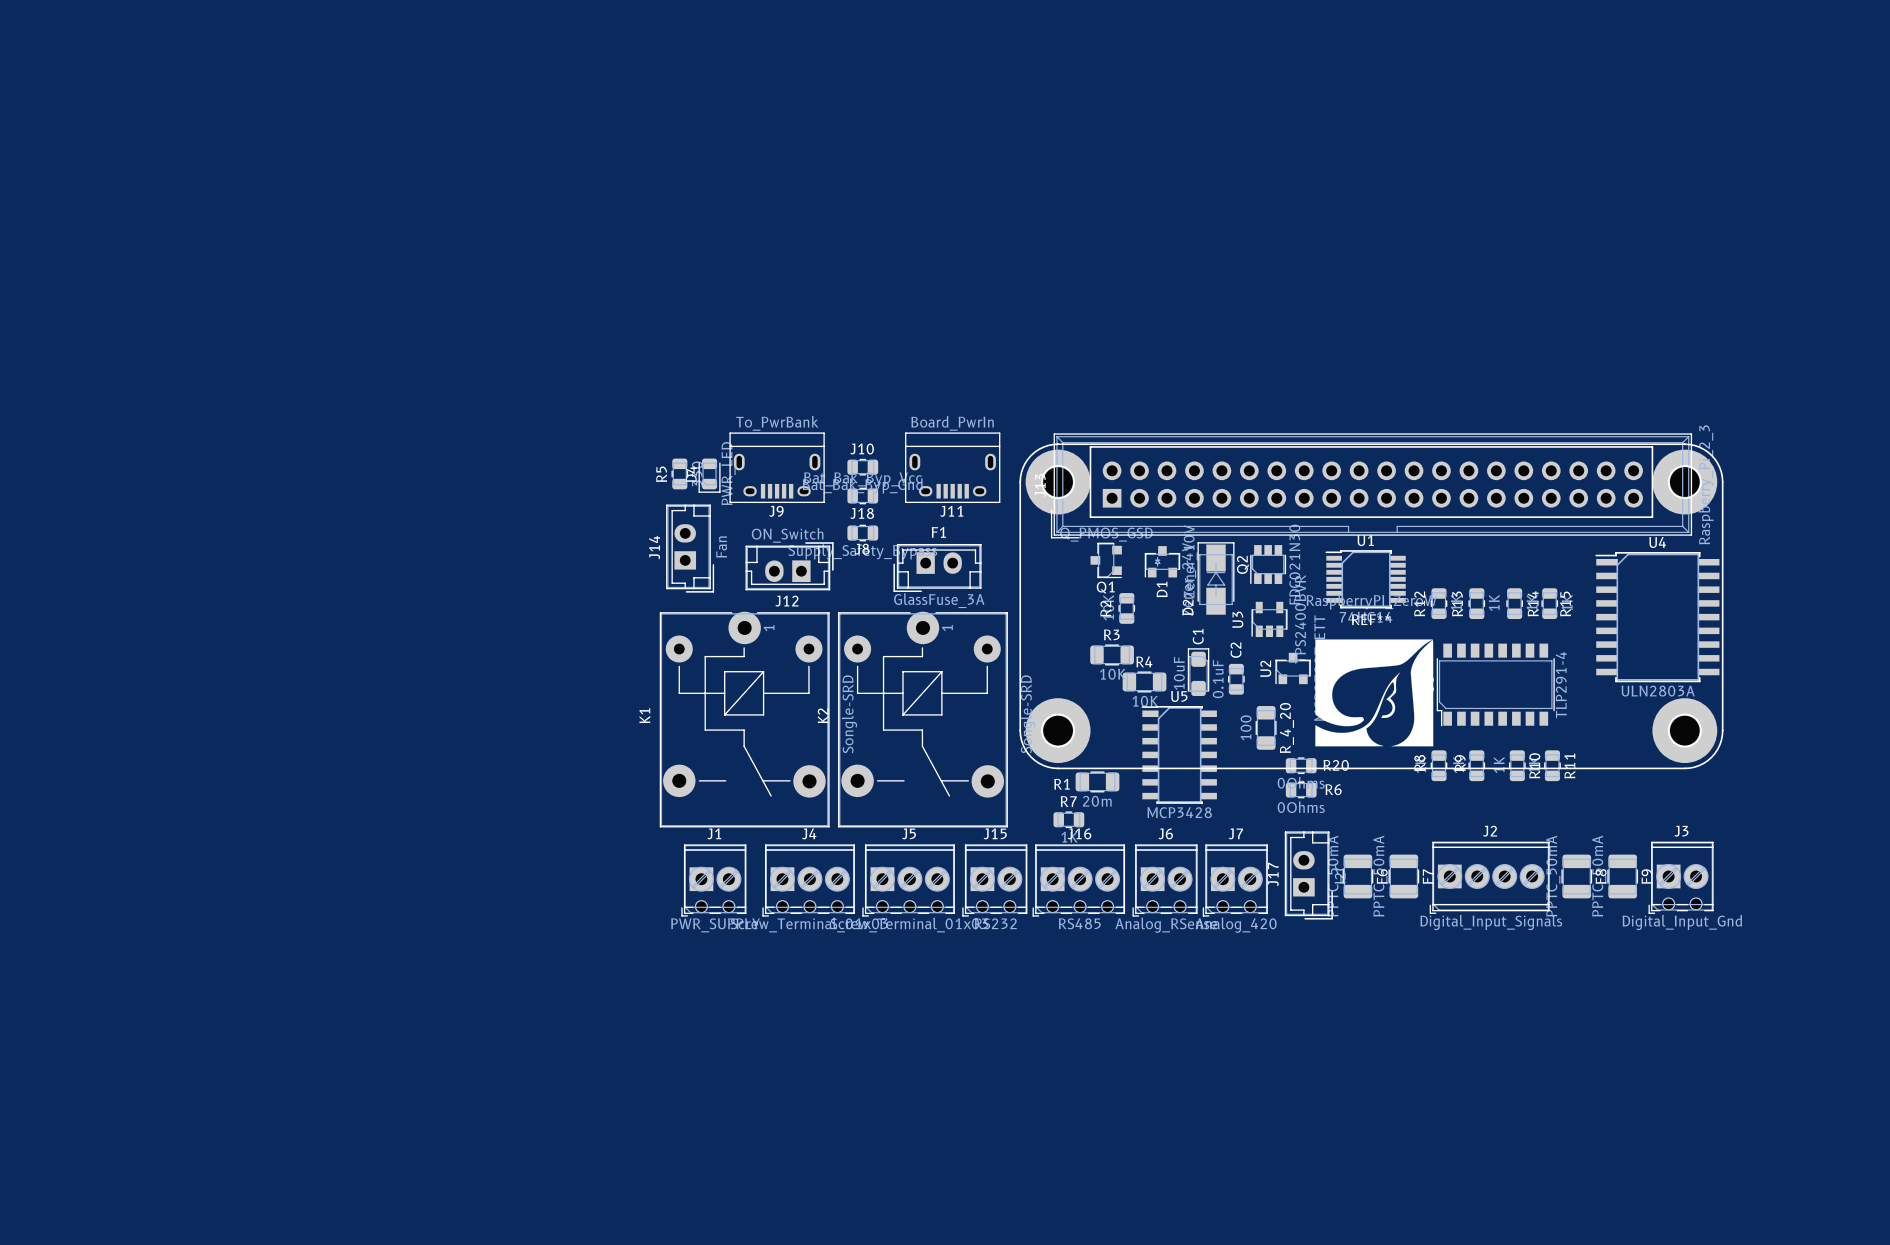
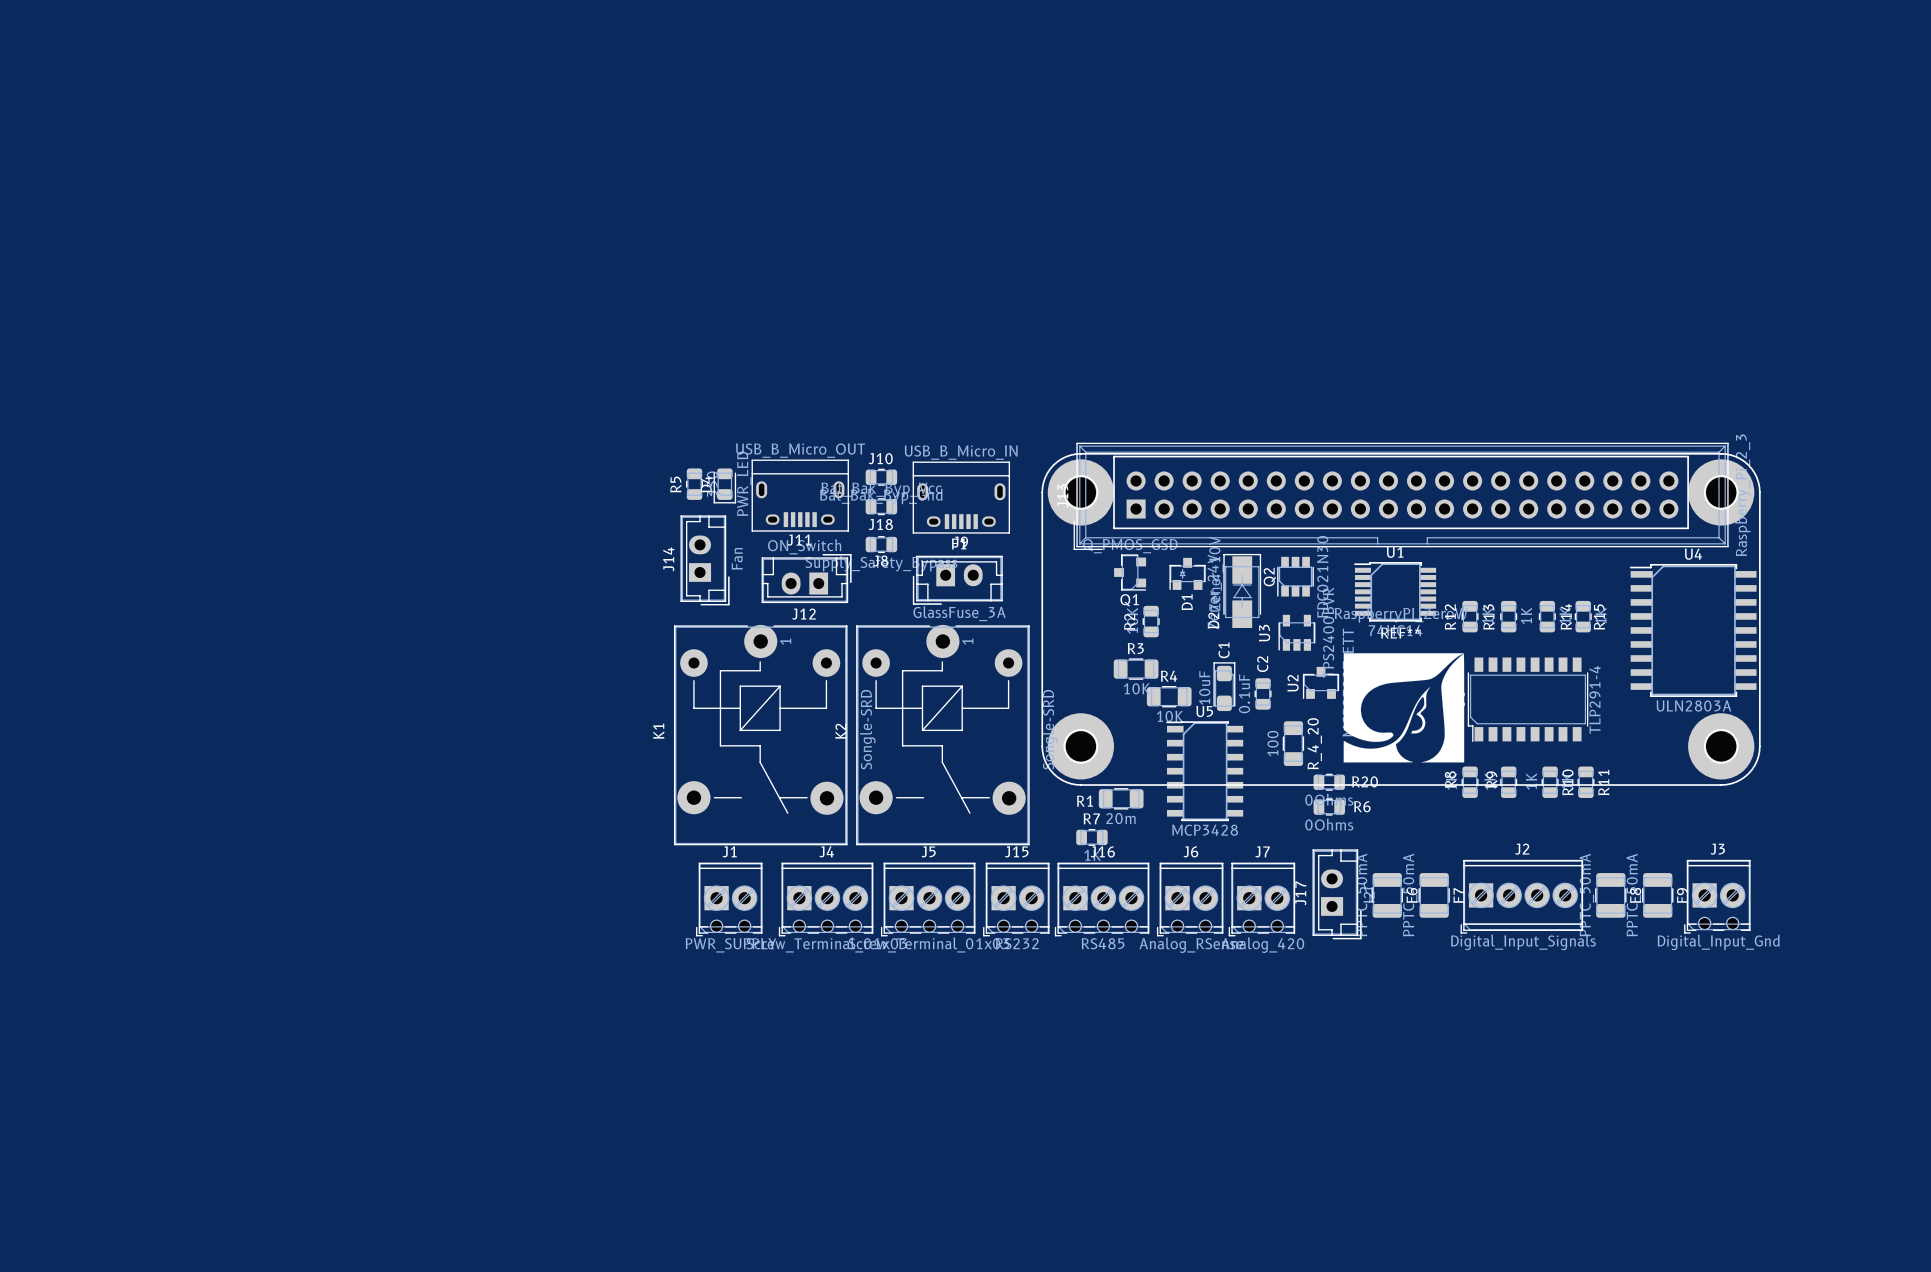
J9 value: To_PwrBank (777, 423) -> USB_B_Micro_IN (961, 452)
J11 value: Board_PwrIn (952, 423) -> USB_B_Micro_OUT (800, 450)
J9 position: (777, 467) -> (961, 497)
J11 position: (952, 467) -> (800, 495)

